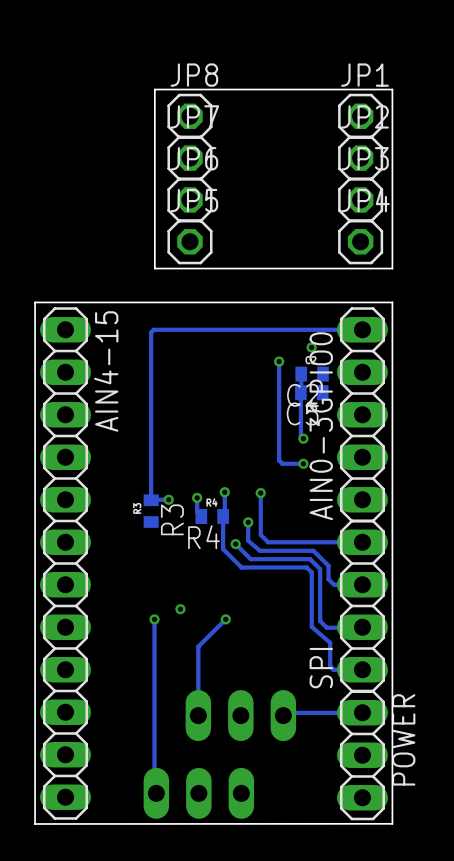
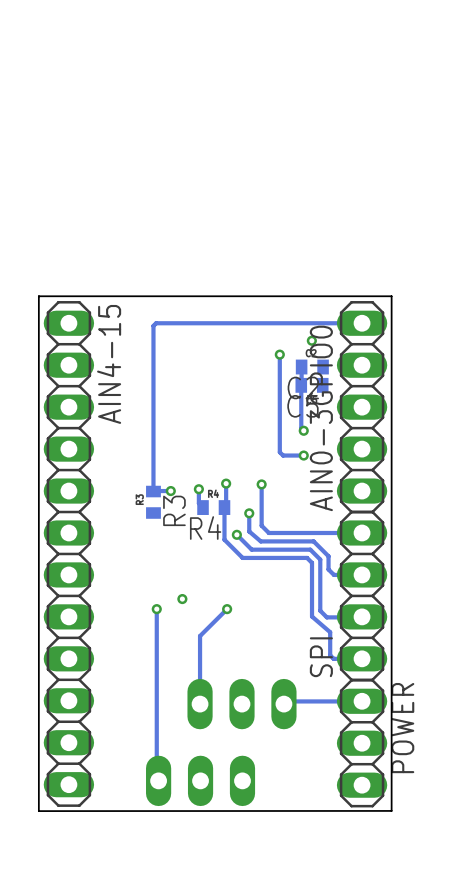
board edge: (392, 89) (392, 268) (154, 268) (154, 89) (392, 89) -> none
JP8: (189, 116) -> none
JP1: (360, 116) -> none
JP7: (189, 158) -> none
JP2: (360, 158) -> none
JP6: (189, 199) -> none
JP3: (360, 199) -> none
JP5: (189, 241) -> none
JP4: (360, 241) -> none

